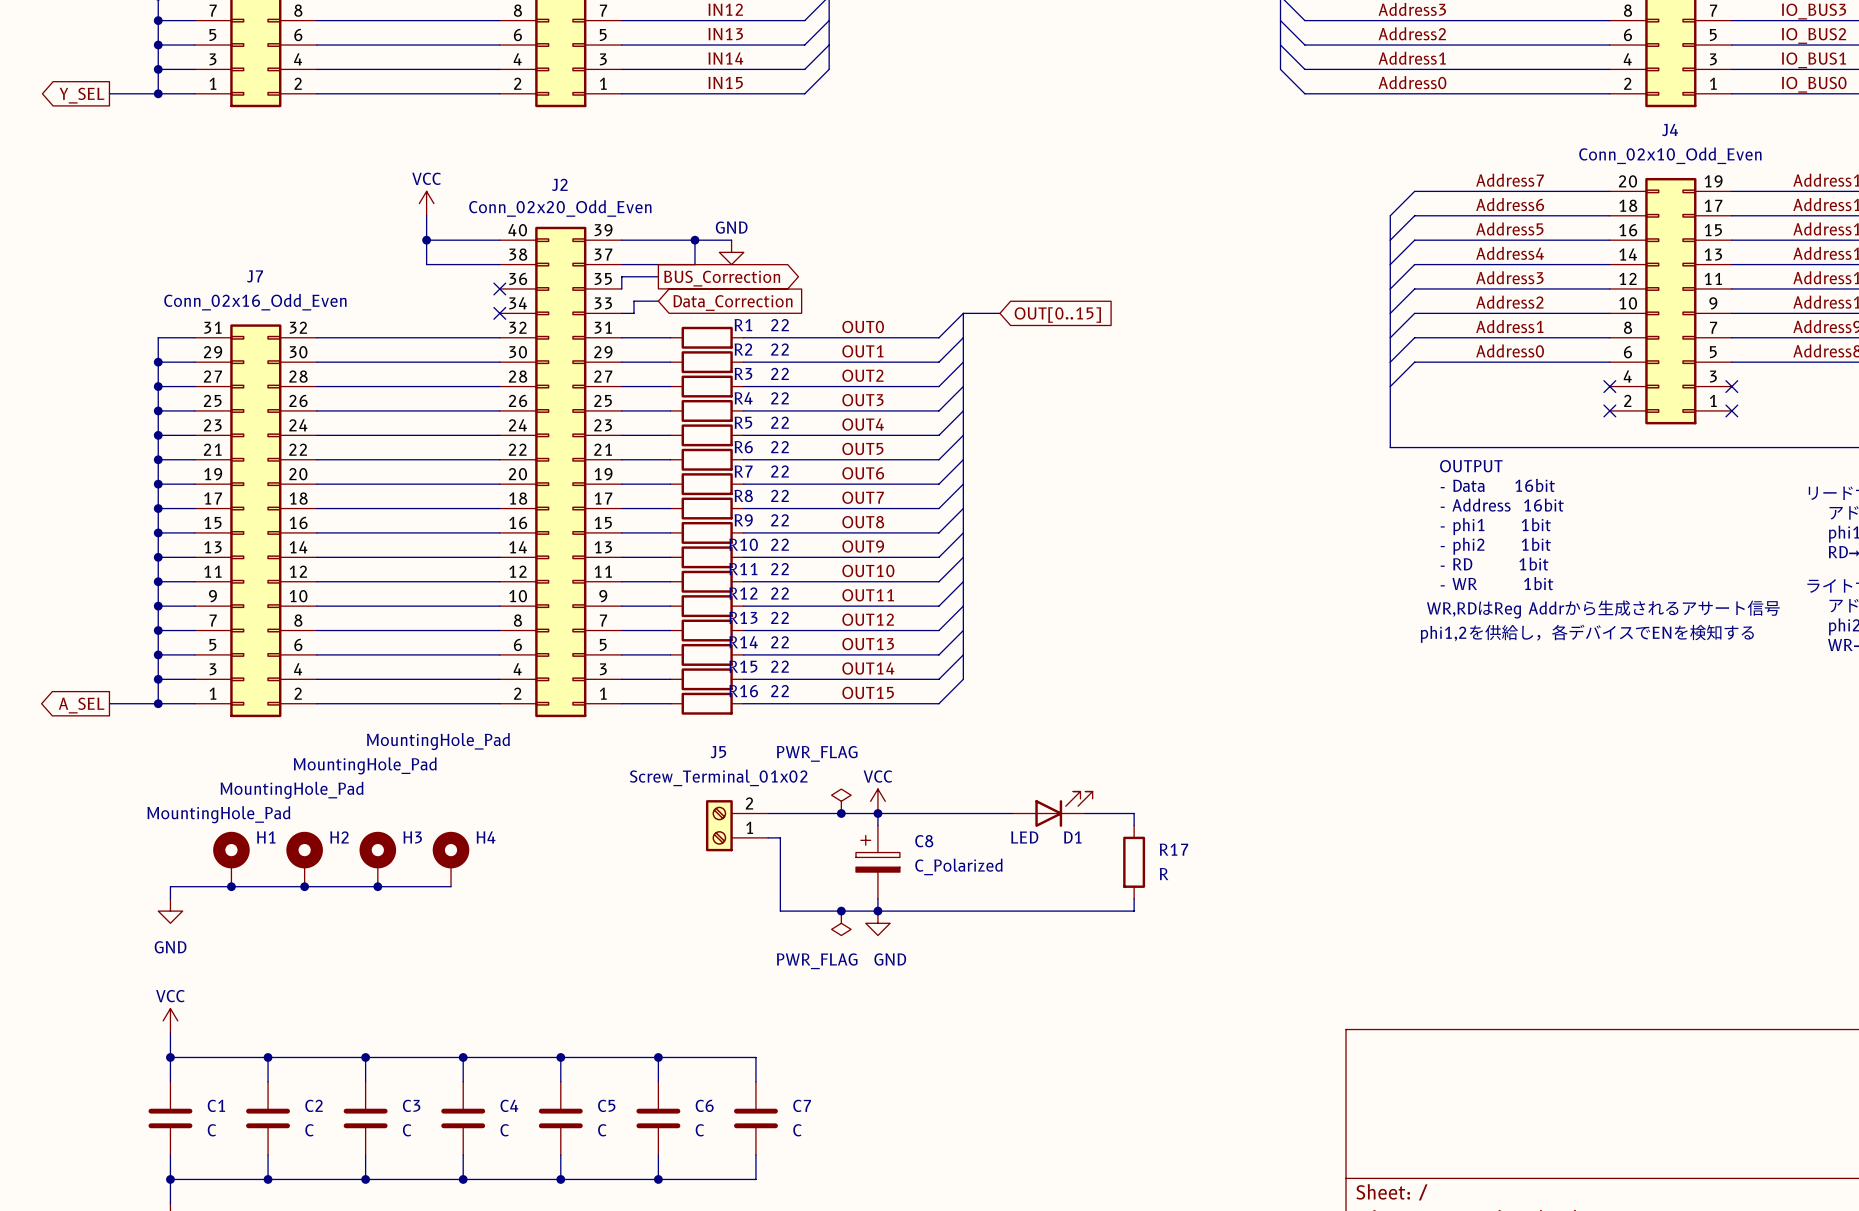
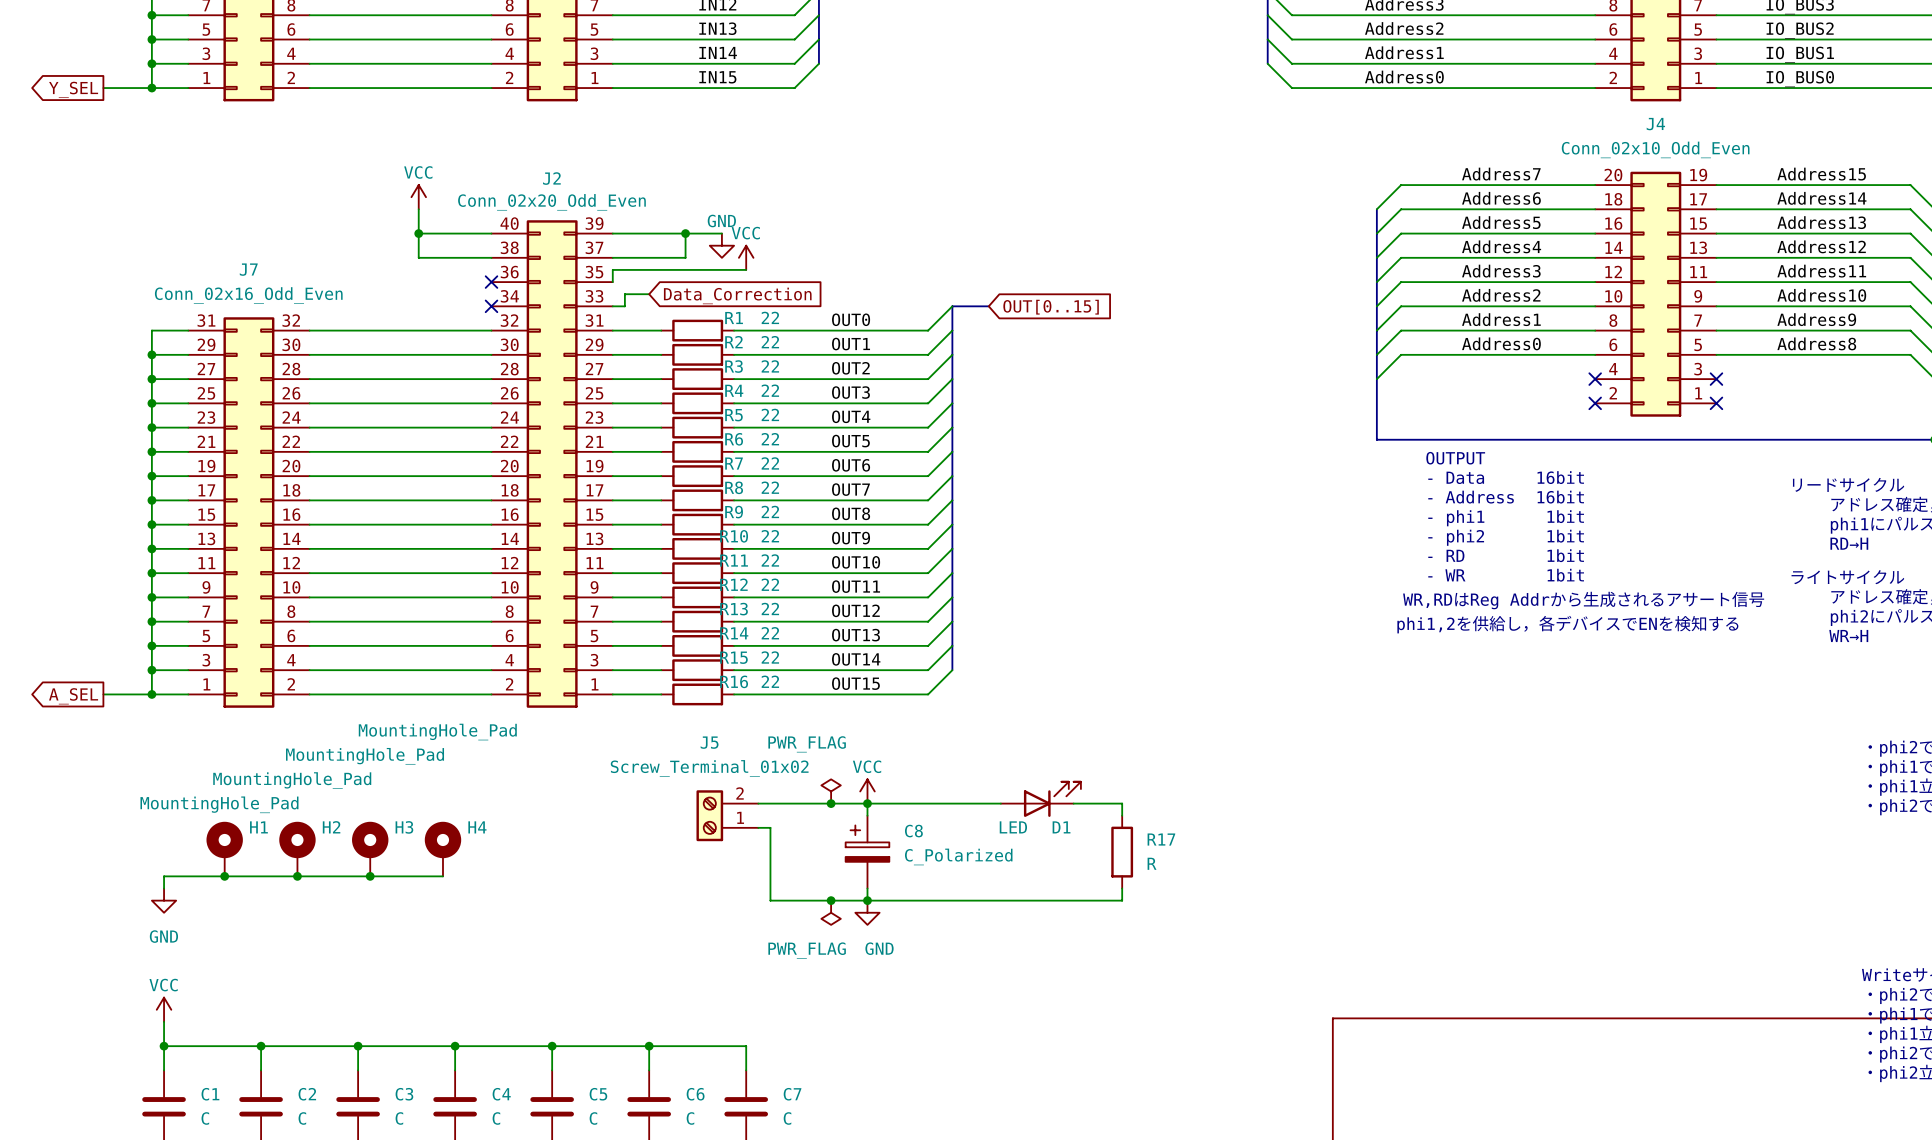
power symbol: none -> VCC (746, 257)
wire: none -> (649, 269) (746, 269)
global label: BUS_Correction (722, 278) -> none

